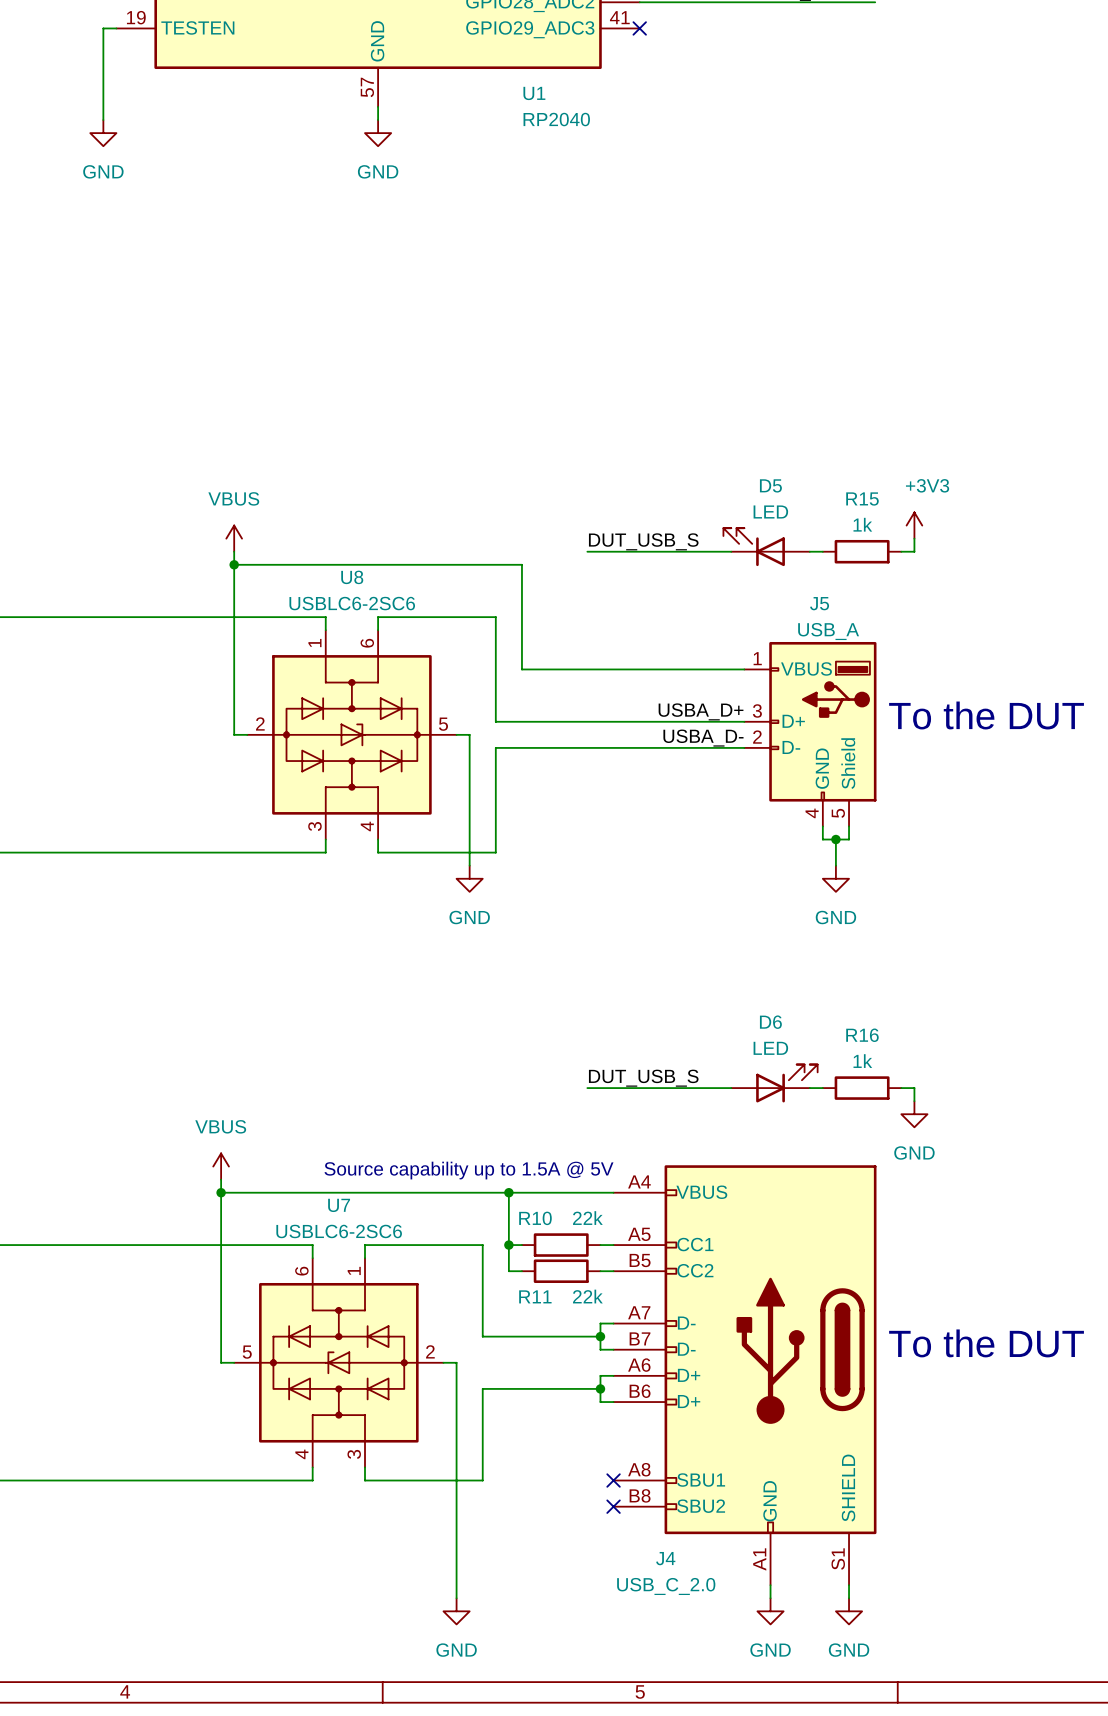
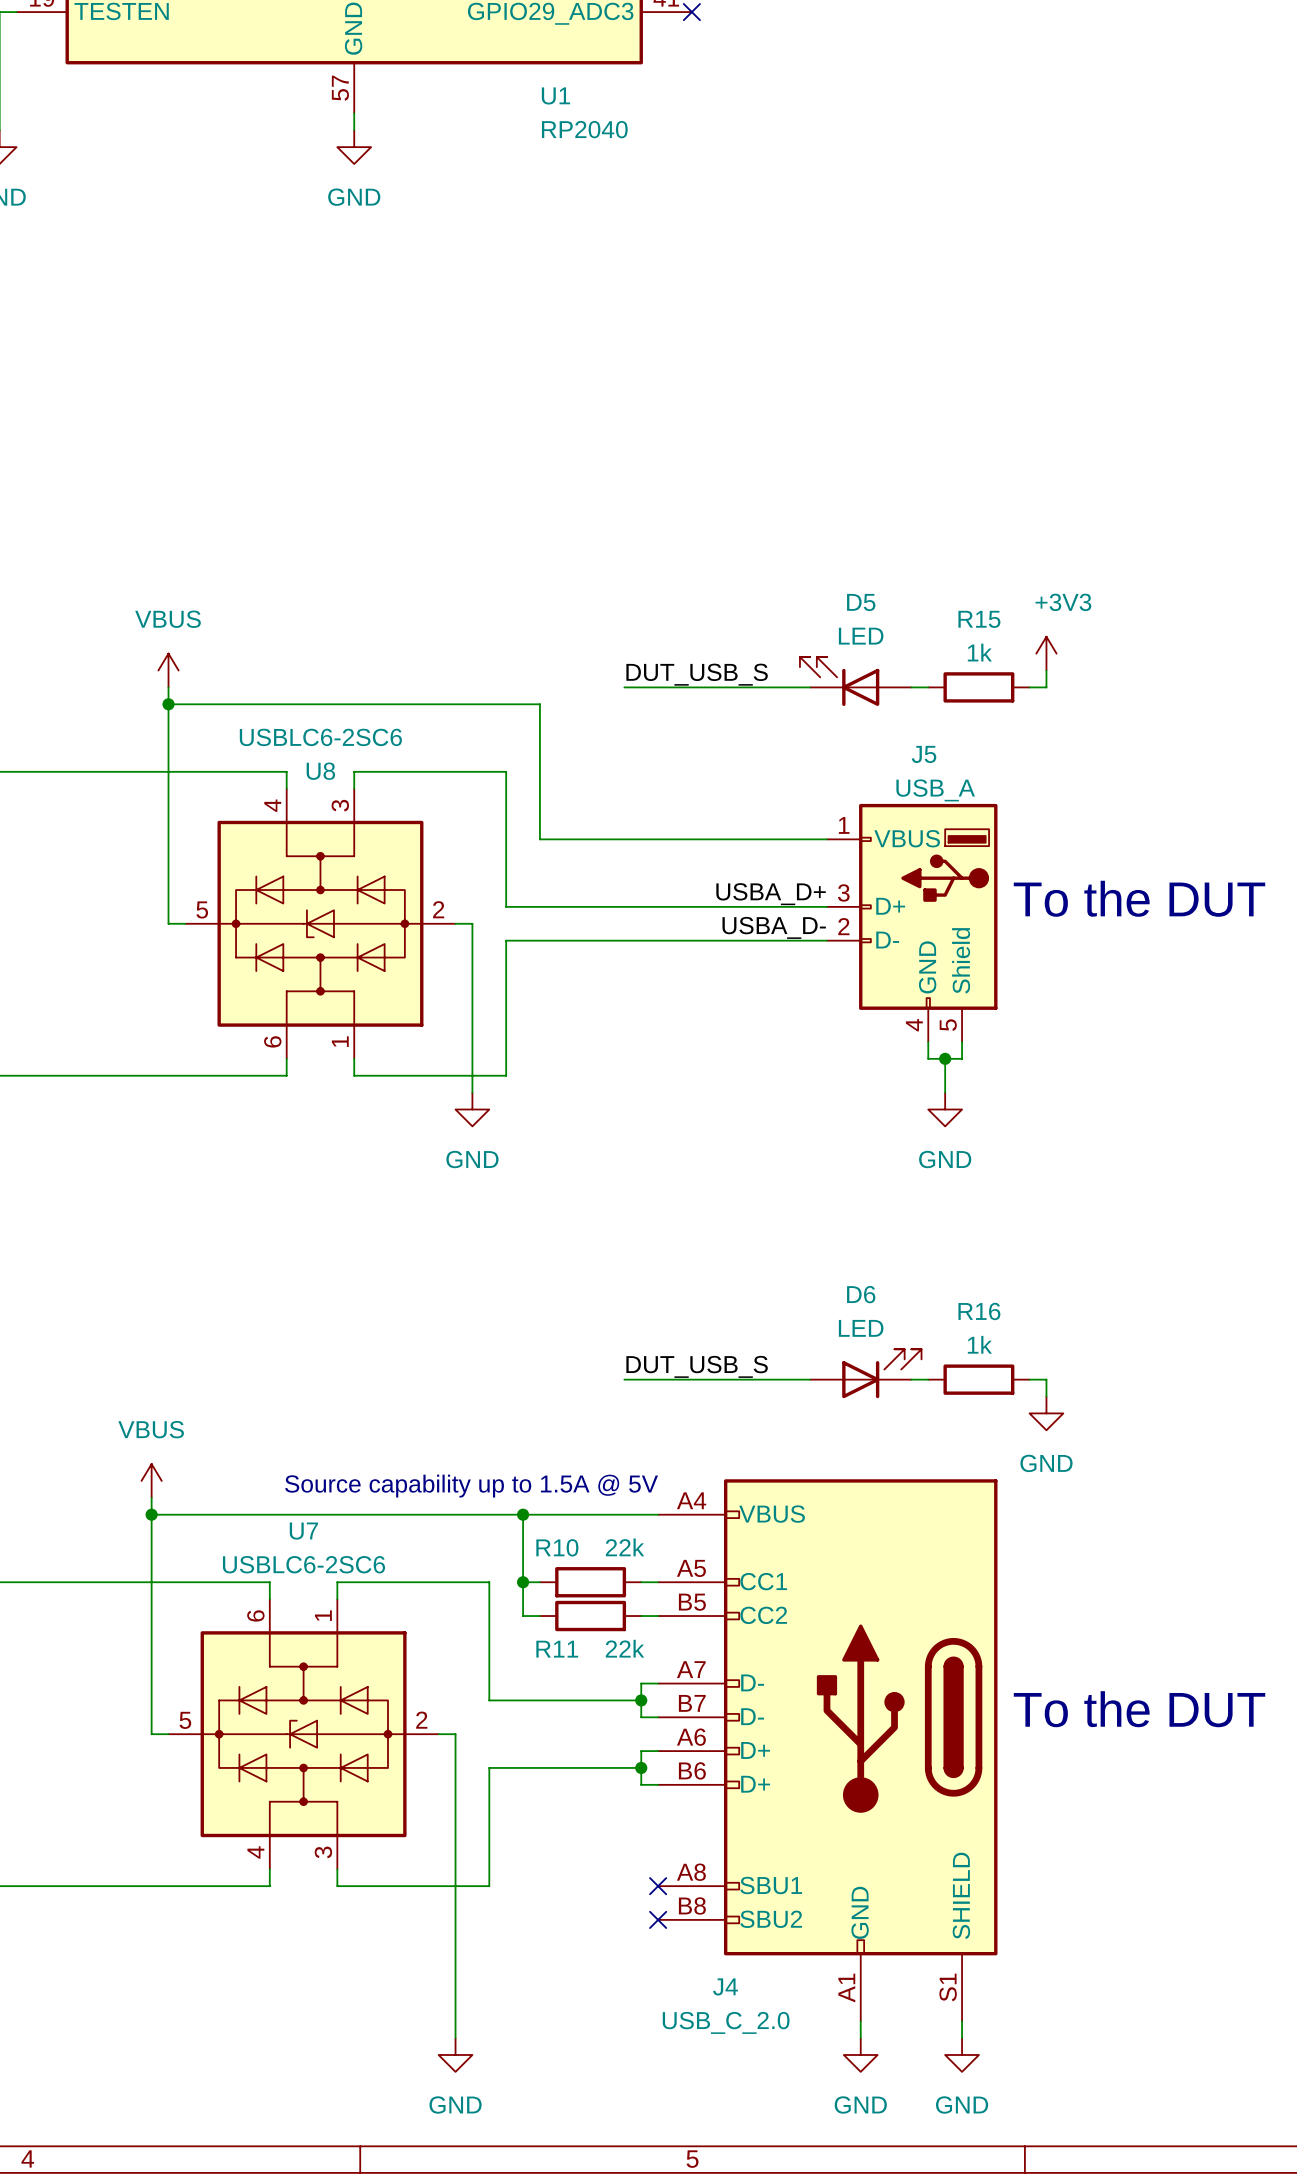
U8 name position: U8 (352, 577) -> U8 (320, 771)
U8 rotation: 0° (351, 734) -> 180° (320, 923)

